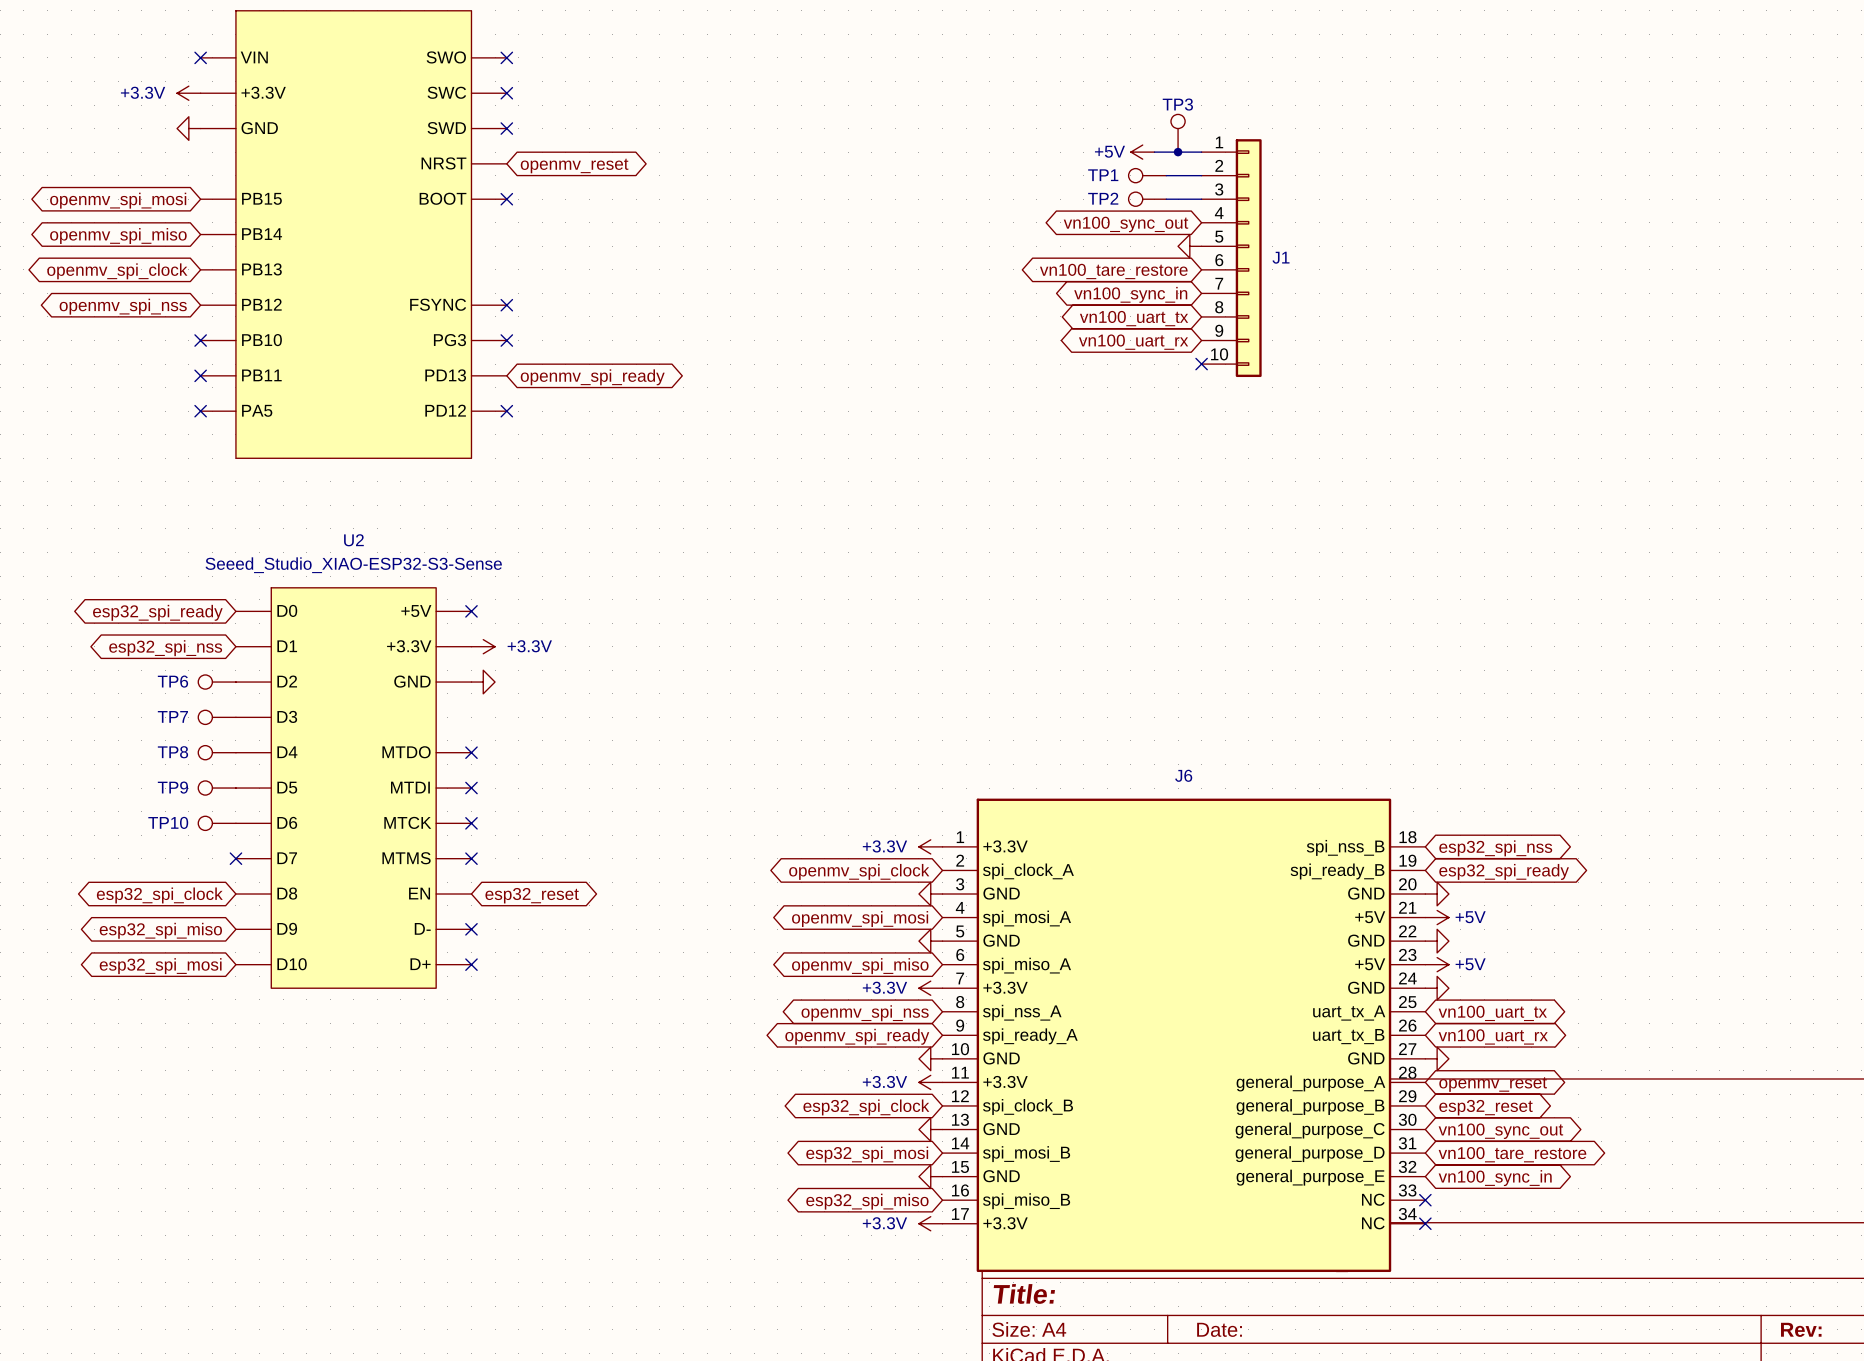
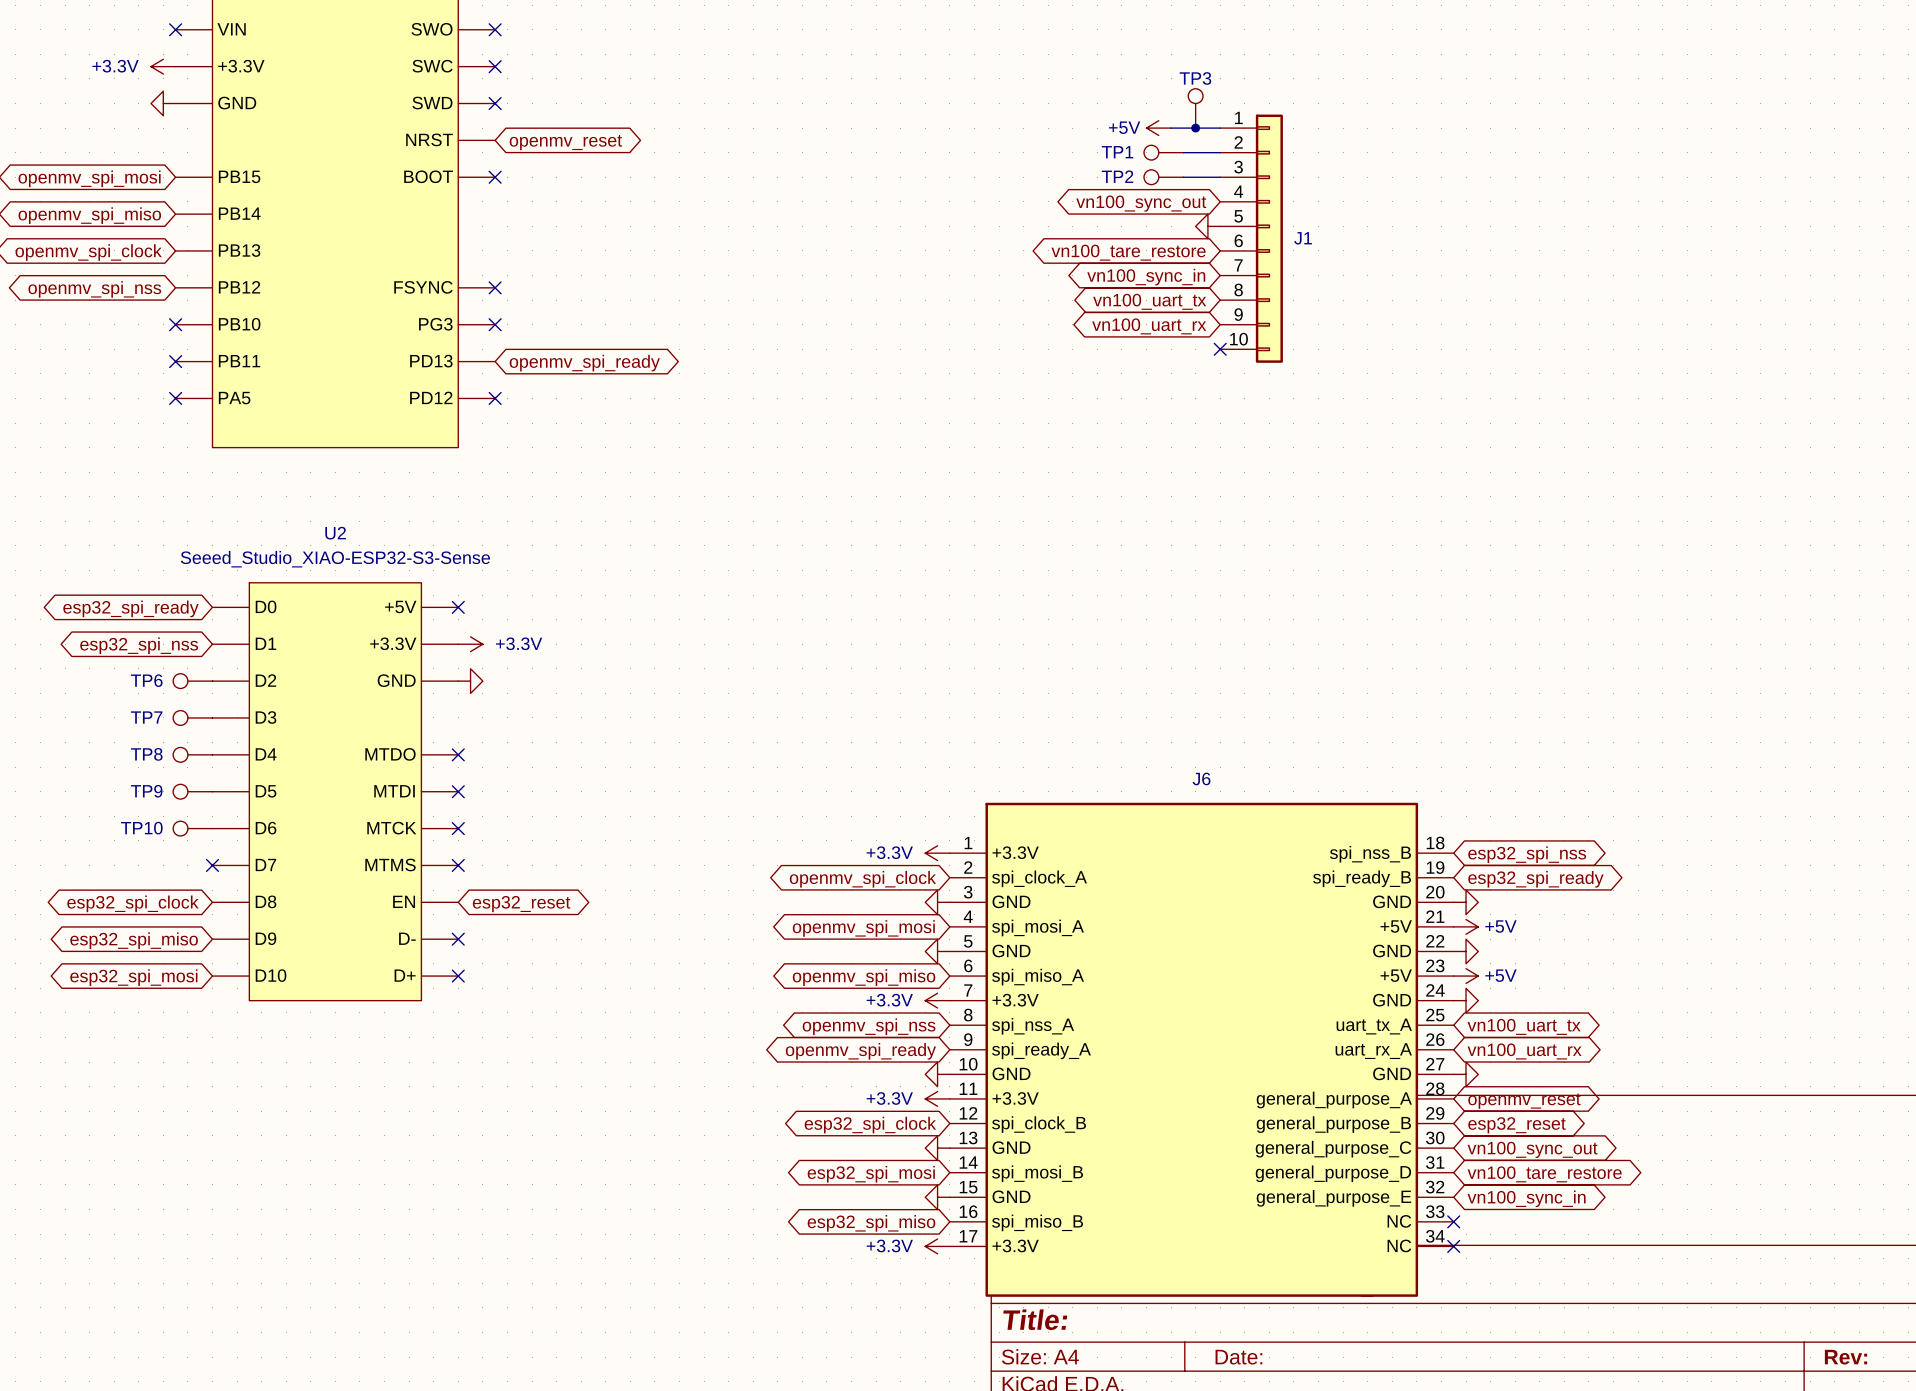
J6 pin name: uart_tx_B (1348, 1036) -> uart_rx_A (1373, 1051)

